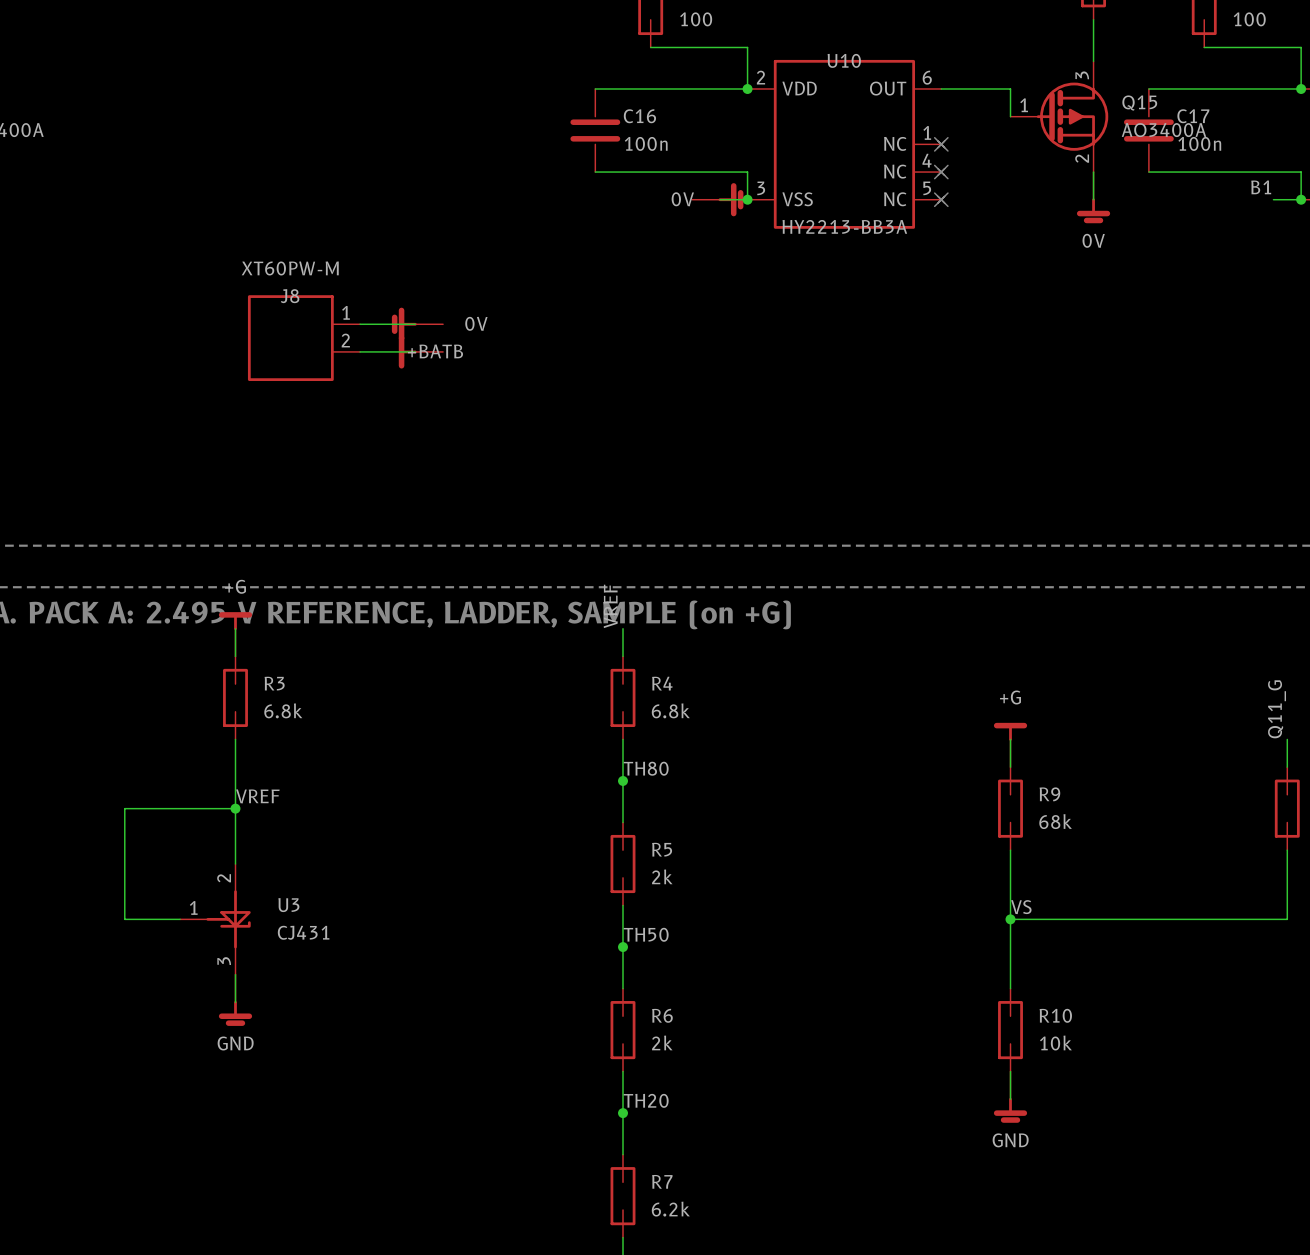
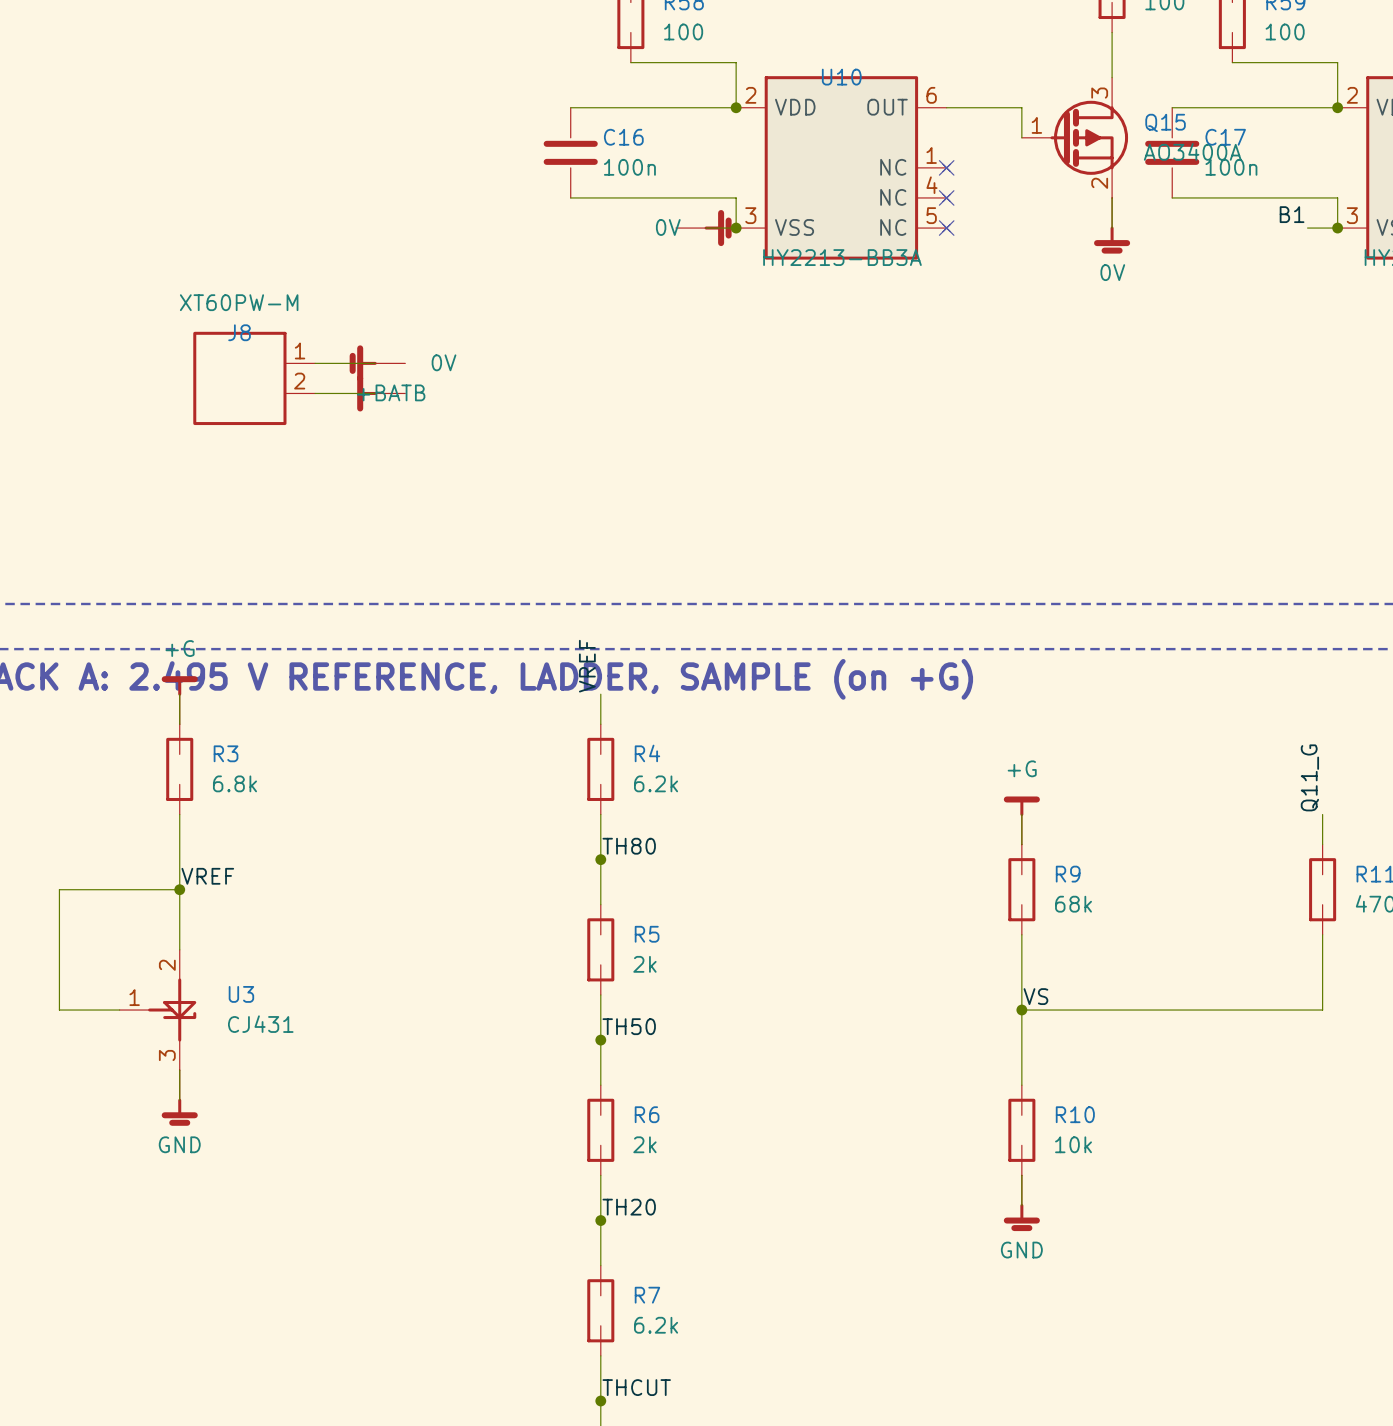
R4 value: 6.8k (670, 710) -> 6.2k (656, 783)

